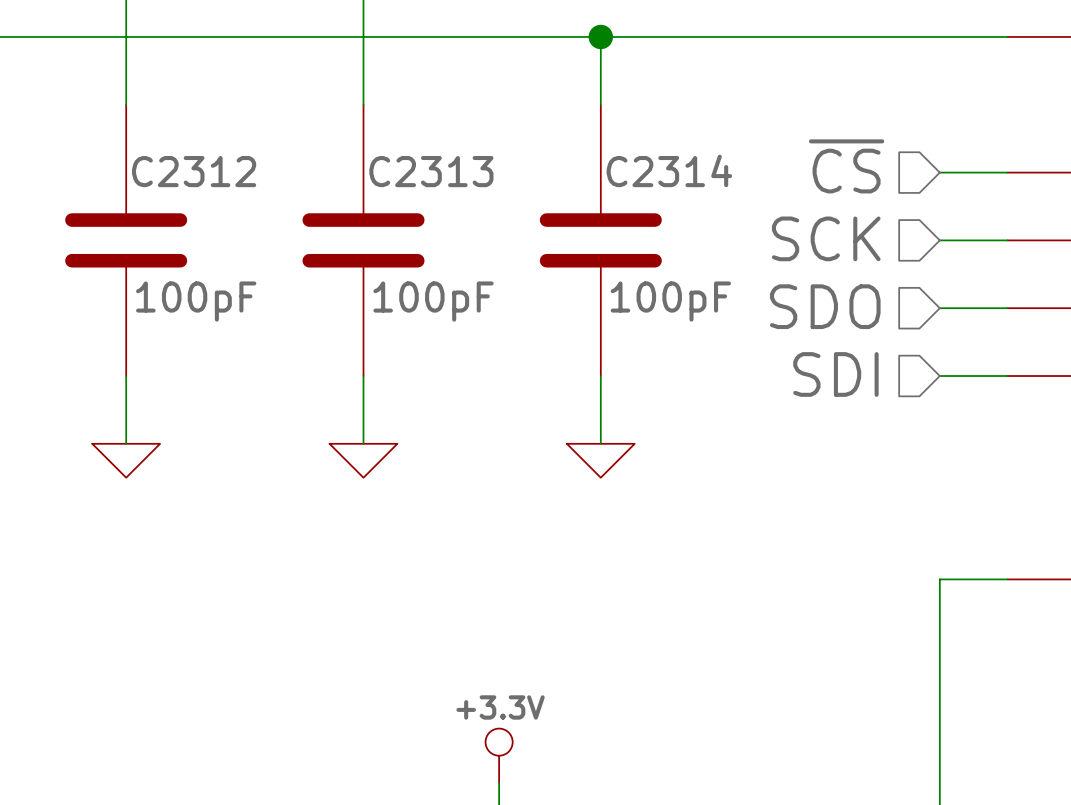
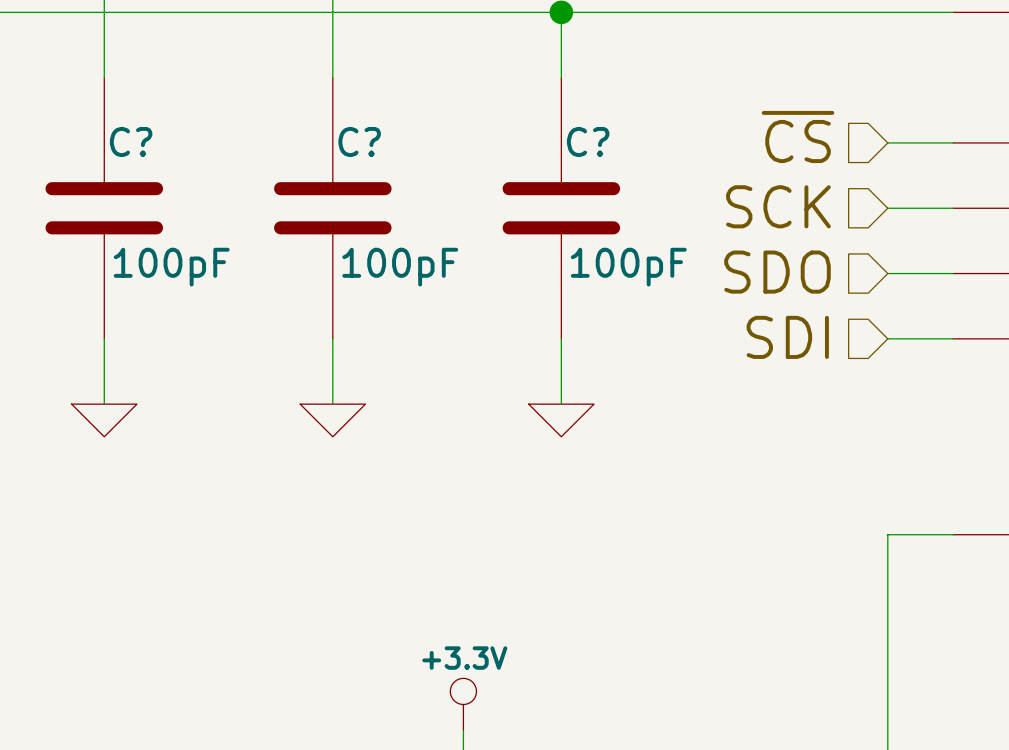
C2314 name: C2314 (669, 170) -> C? (588, 141)
C2312 name: C2312 (194, 171) -> C? (131, 141)
C2313 name: C2313 (431, 171) -> C? (359, 141)

